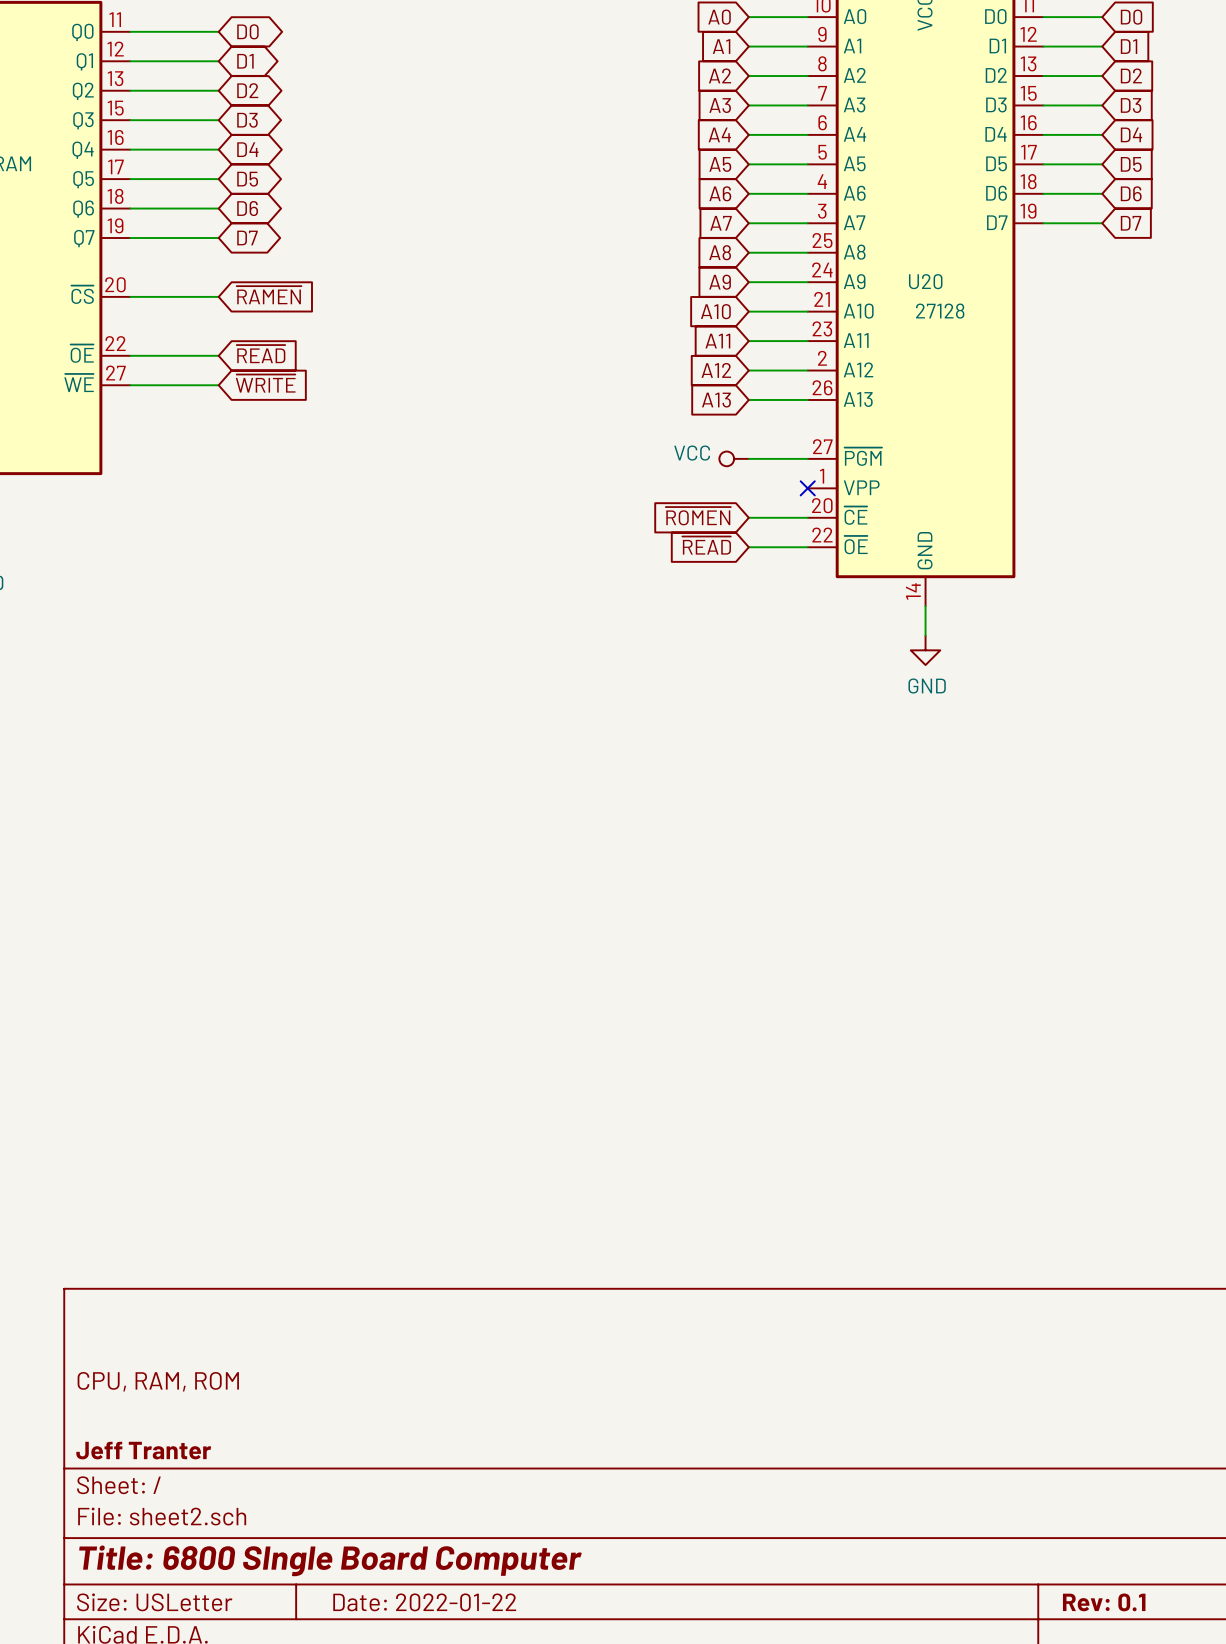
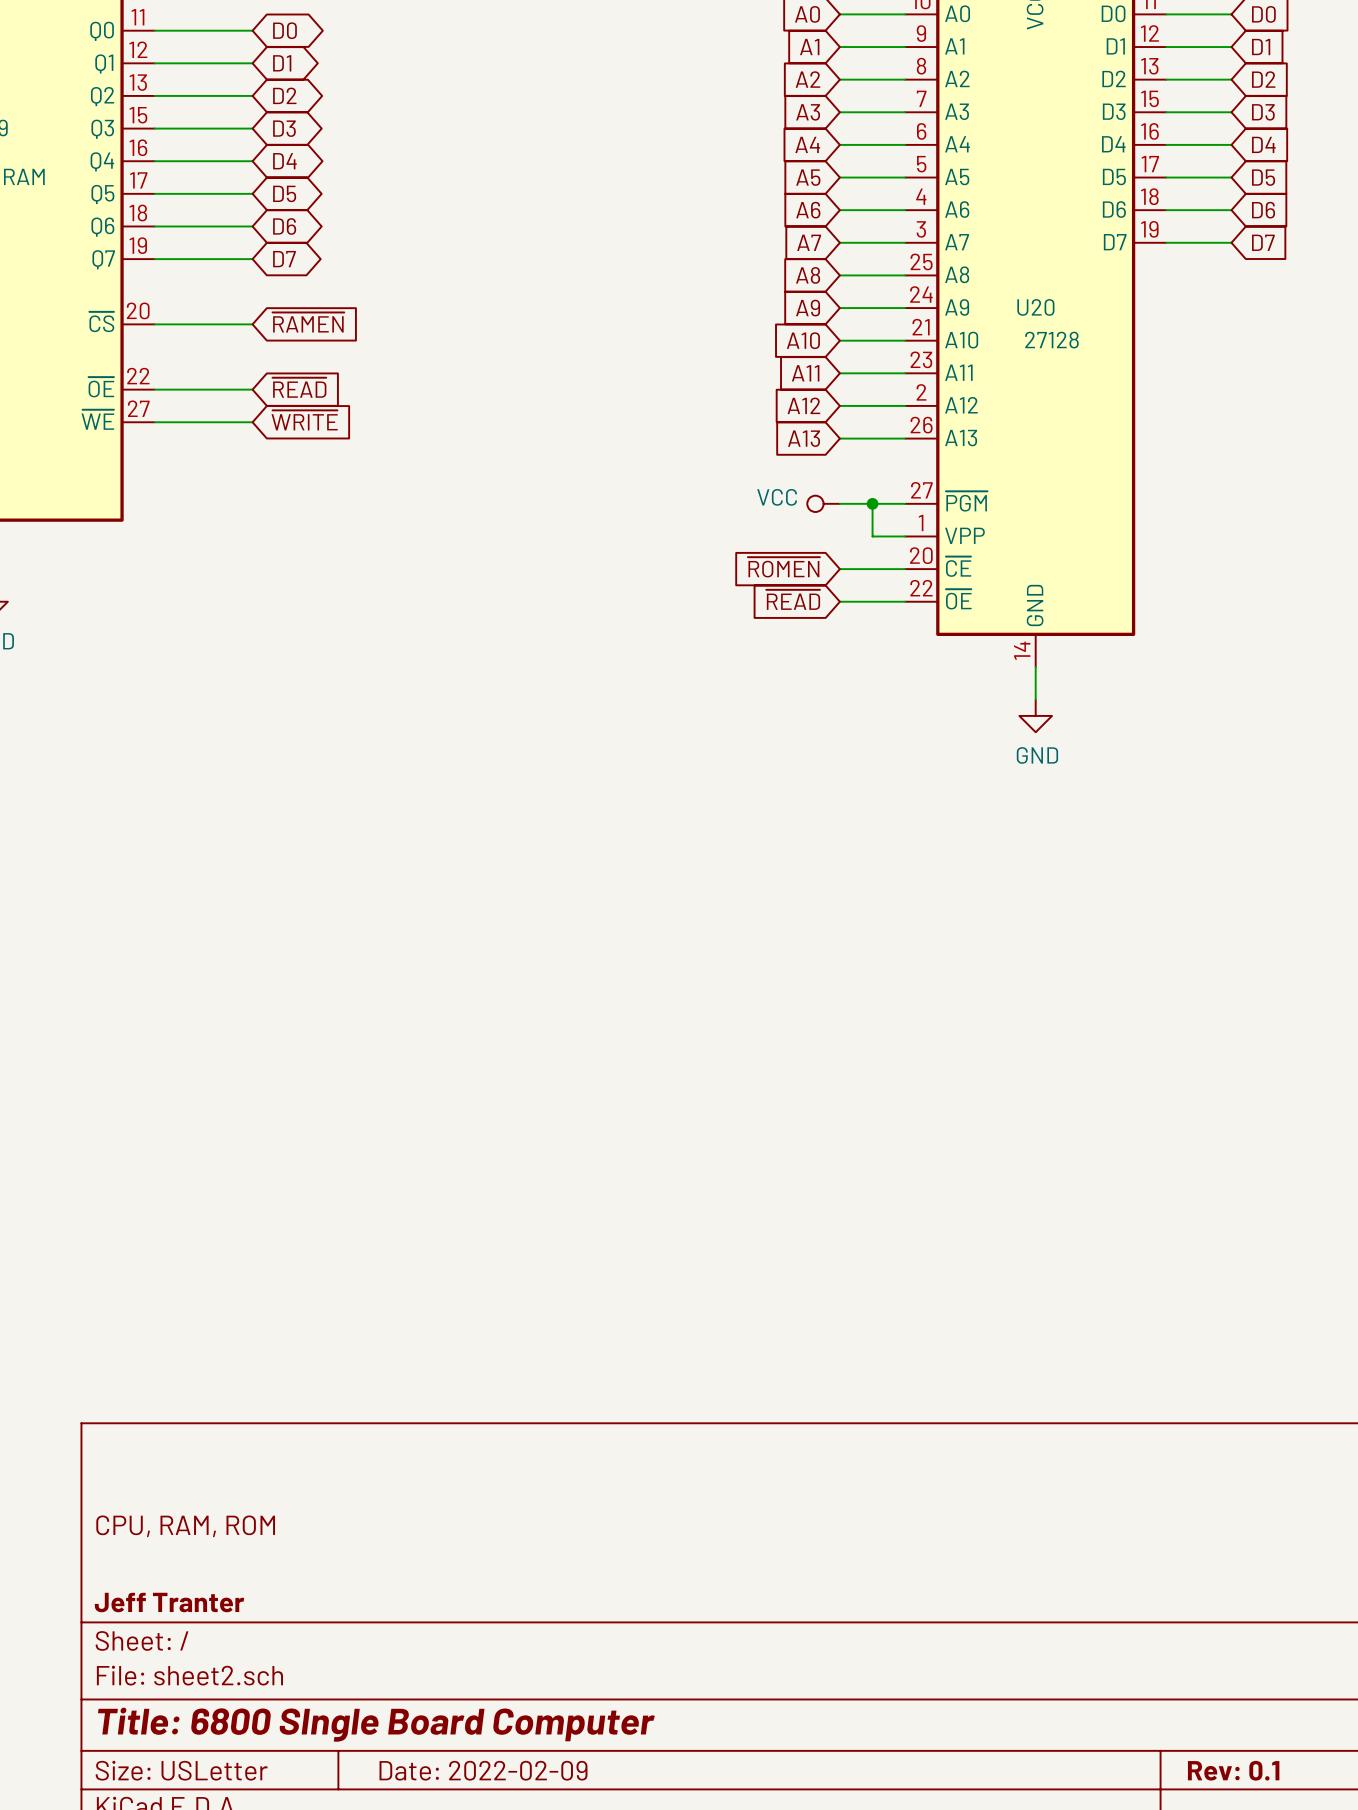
wire: none -> (872, 503) (872, 536) (905, 536)
junction: none -> (872, 503)
no-connect mark: (807, 488) -> none
title block: Date: 2022-01-22 (424, 1602) -> Date: 2022-02-09 (483, 1770)

